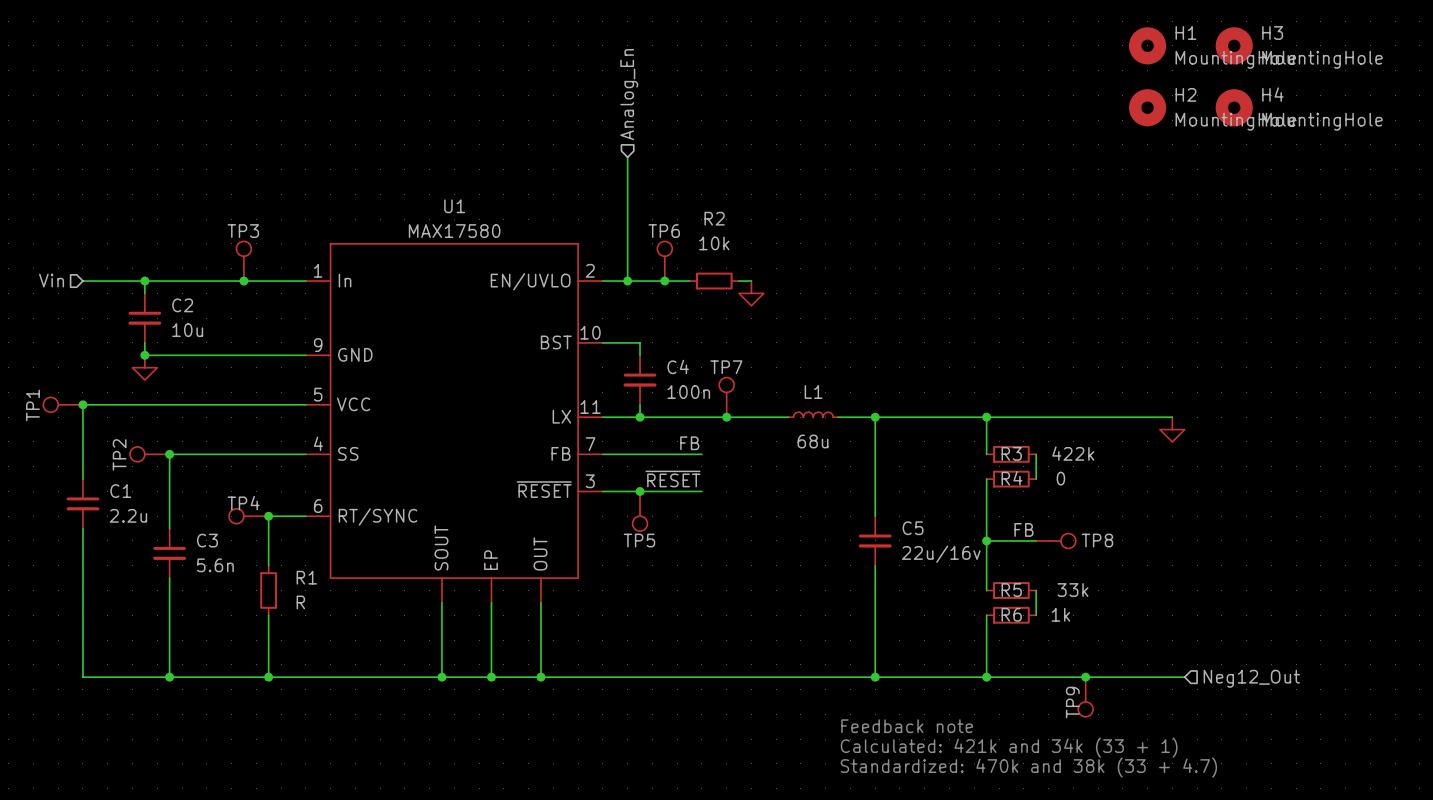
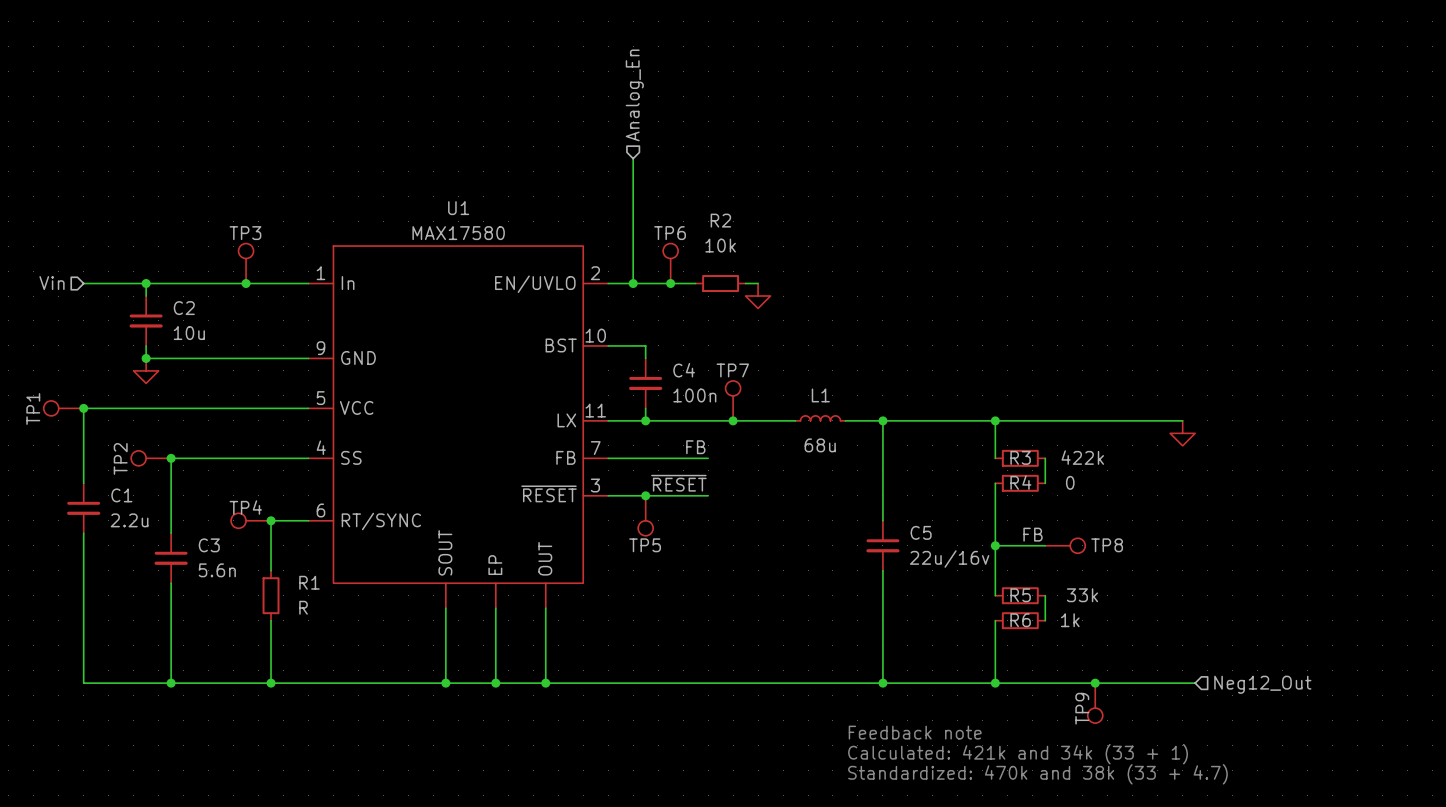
H1: MountingHole (1147, 45) -> none
H3: MountingHole (1234, 45) -> none
H2: MountingHole (1147, 107) -> none
H4: MountingHole (1234, 107) -> none

